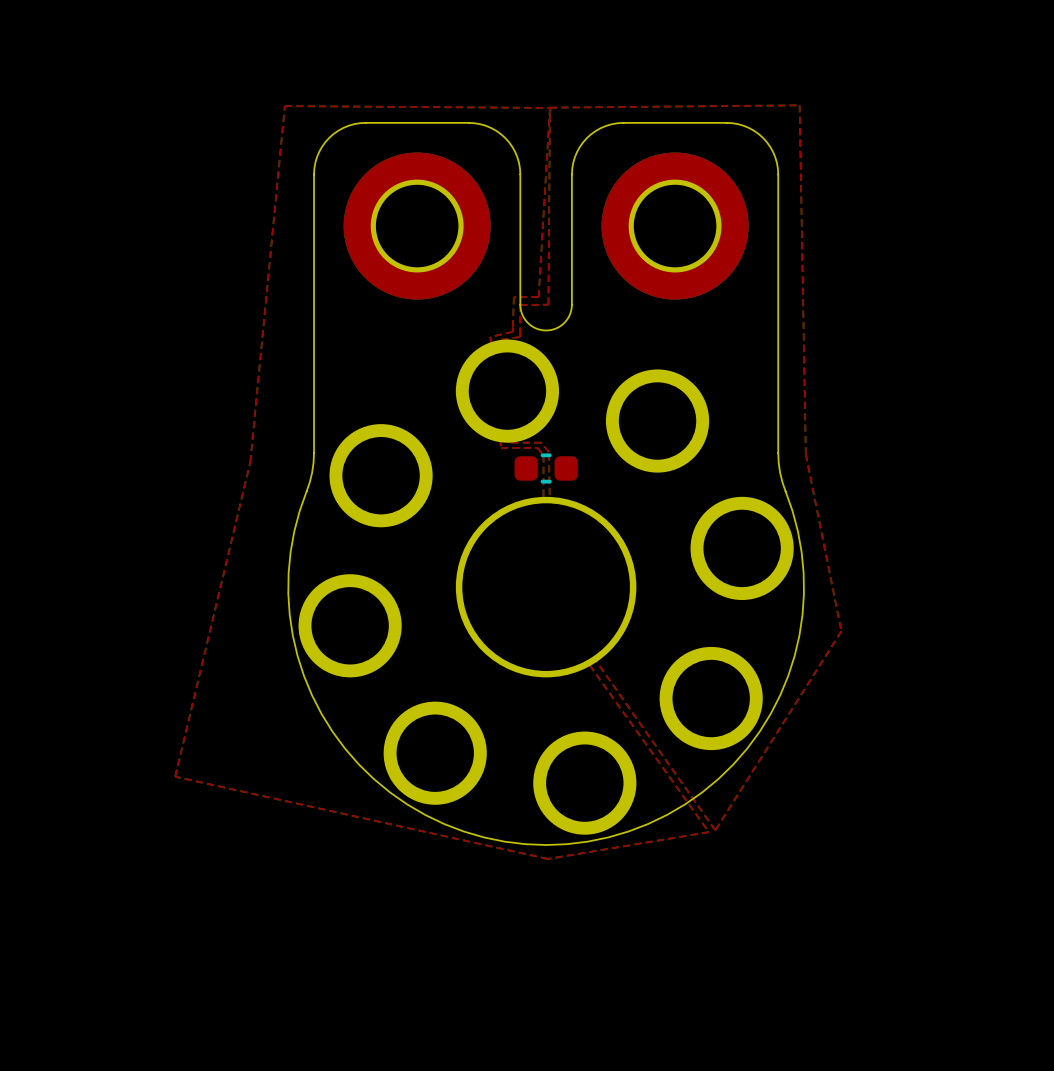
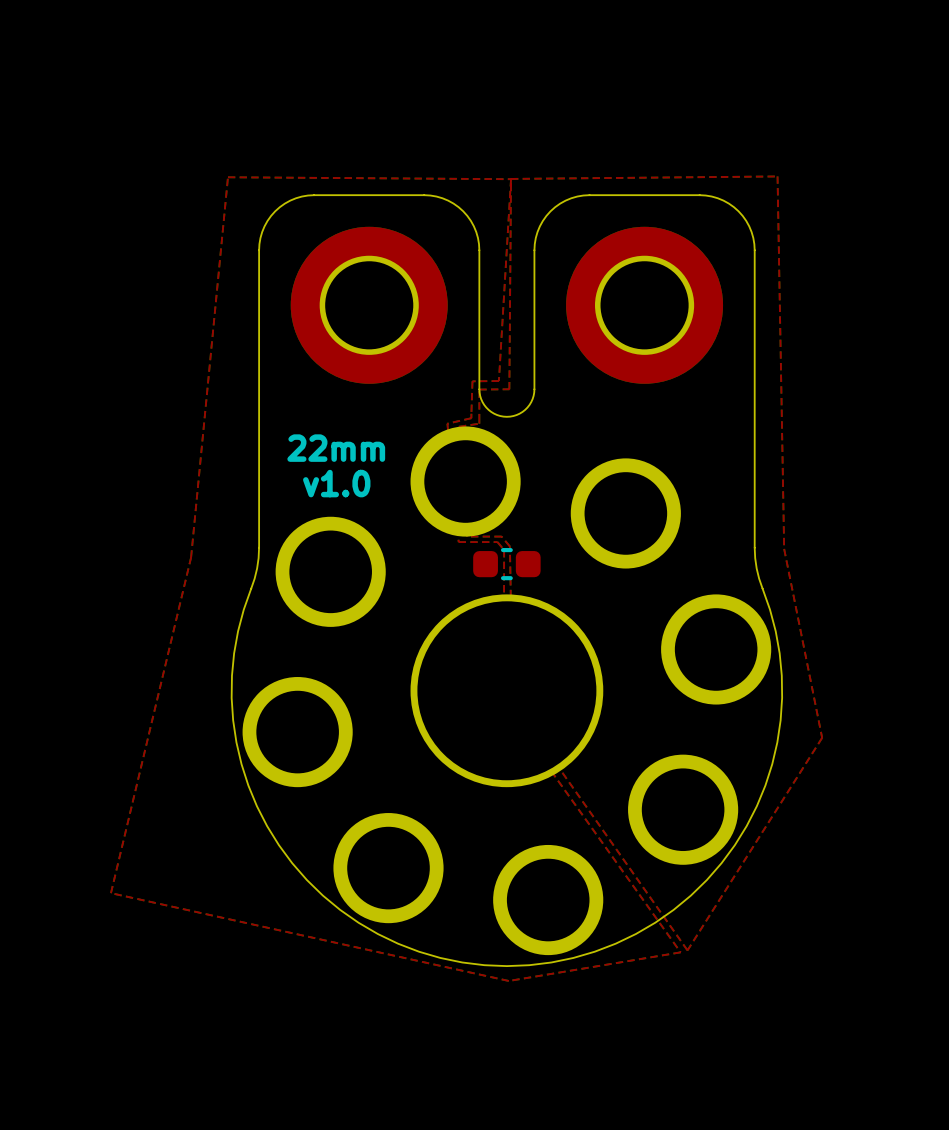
text: none -> 22mm (336, 448)
text: none -> v1.0 (336, 483)

